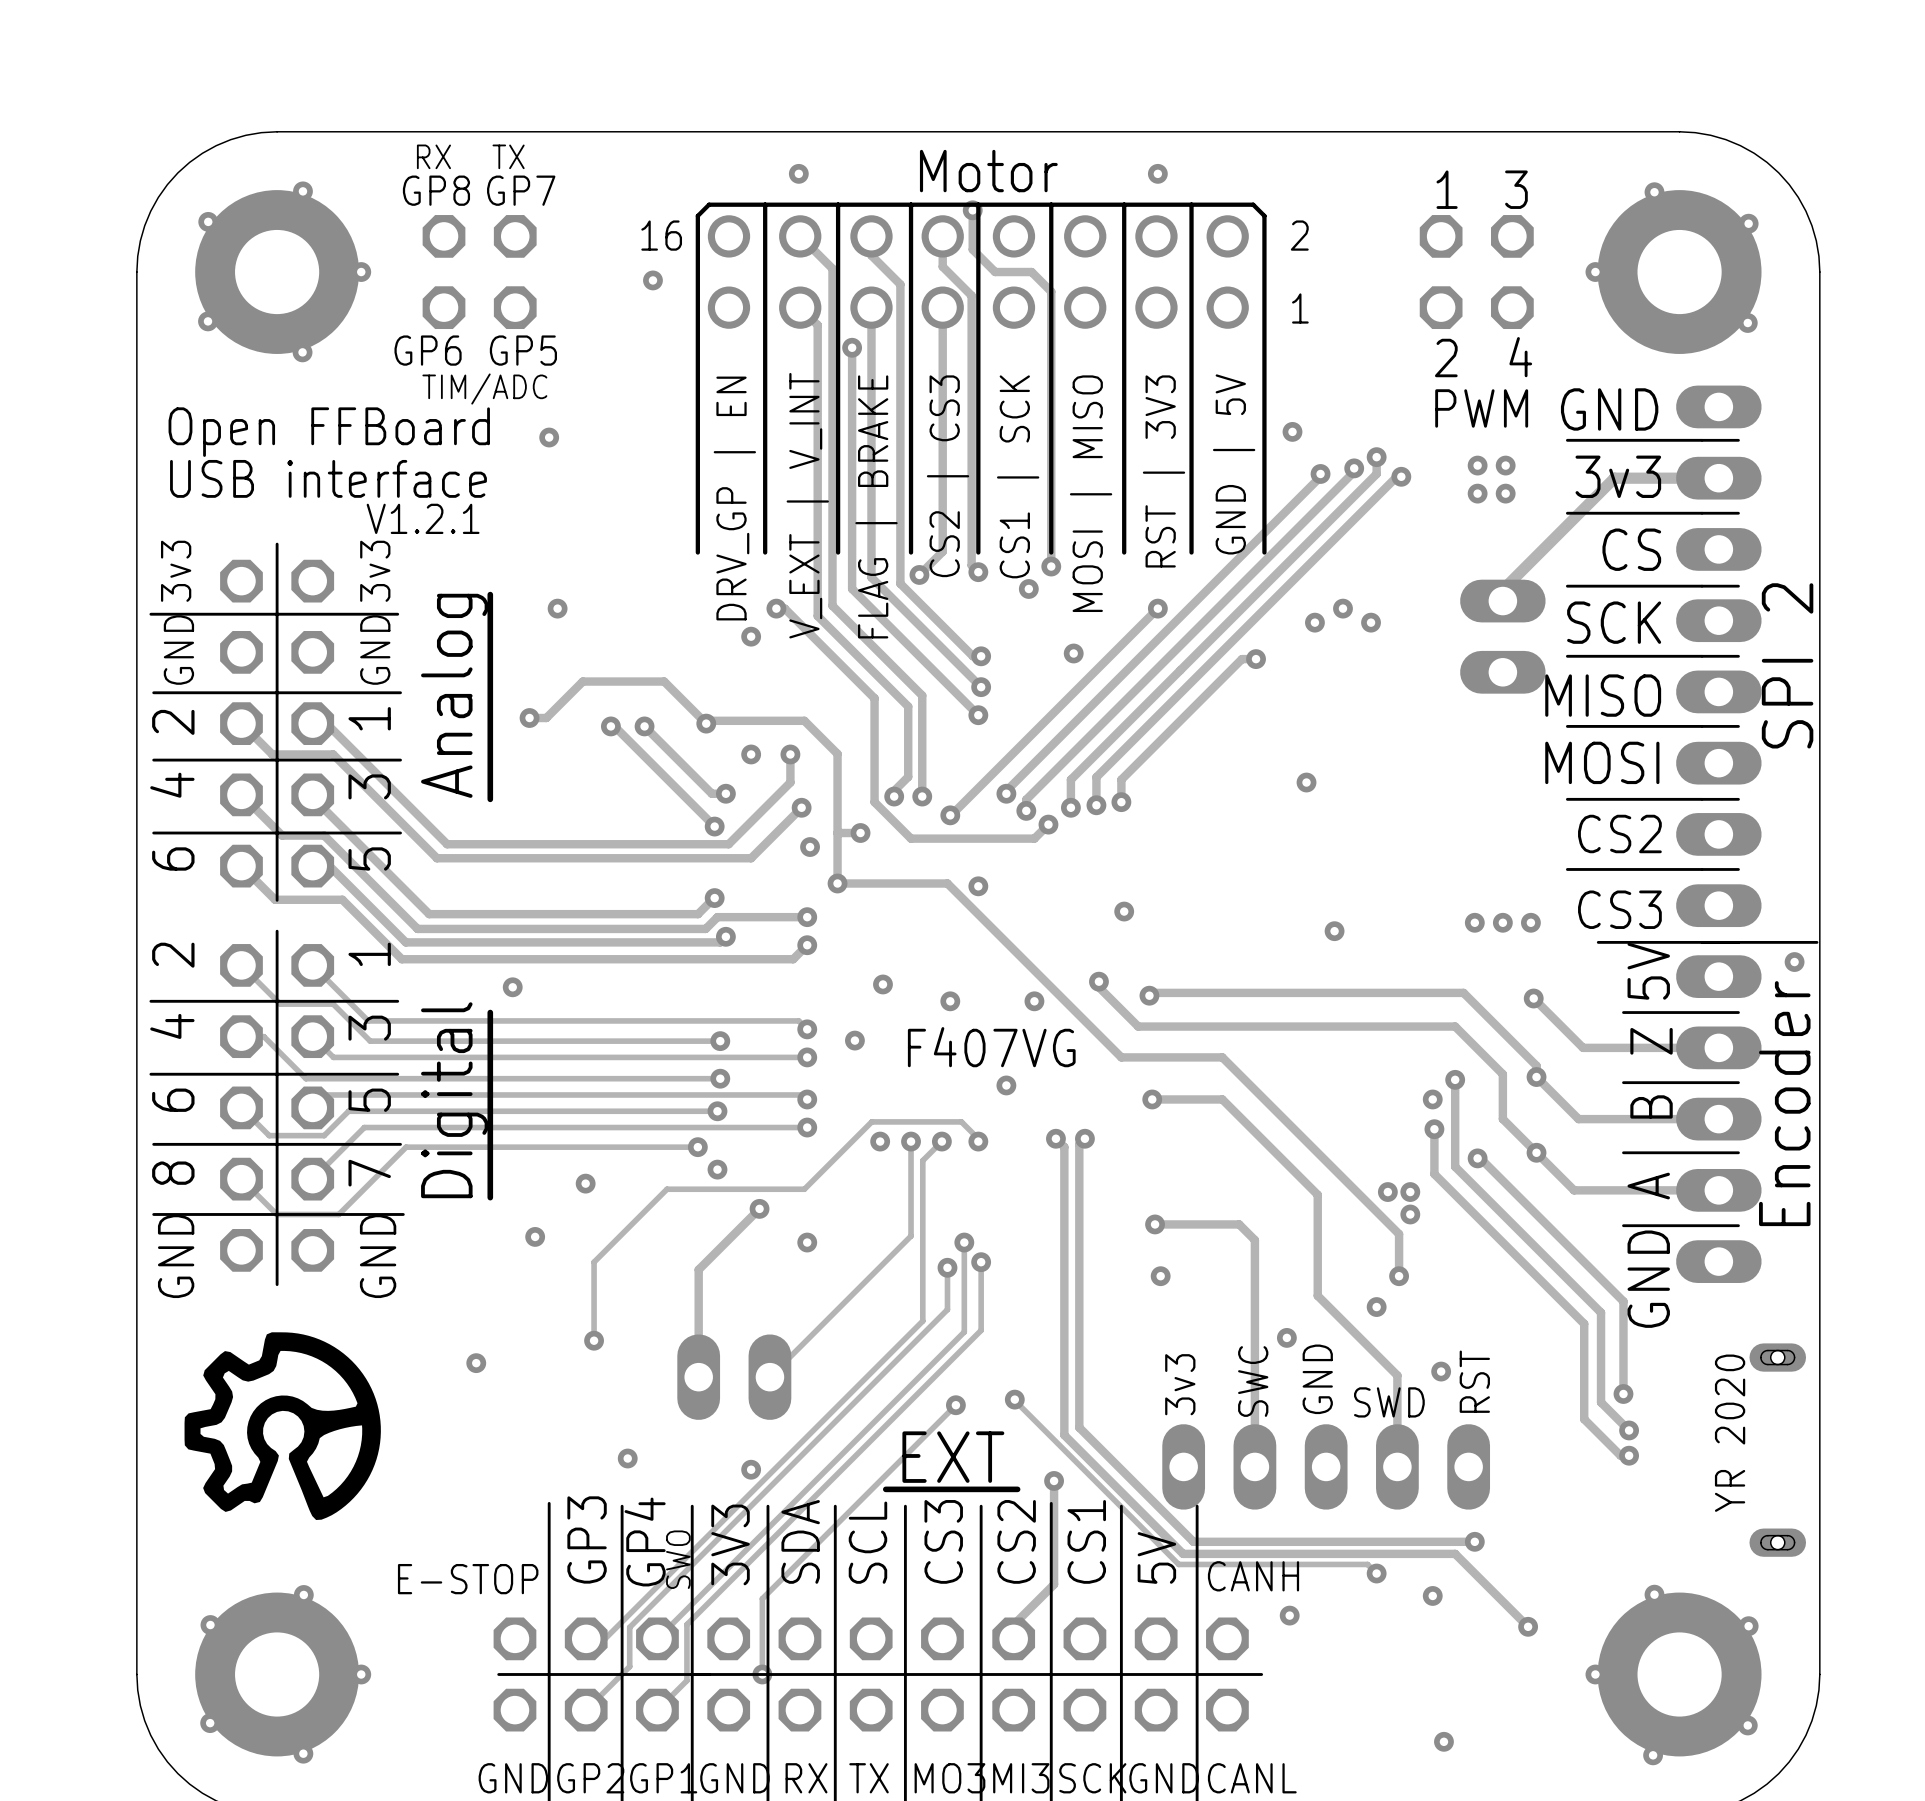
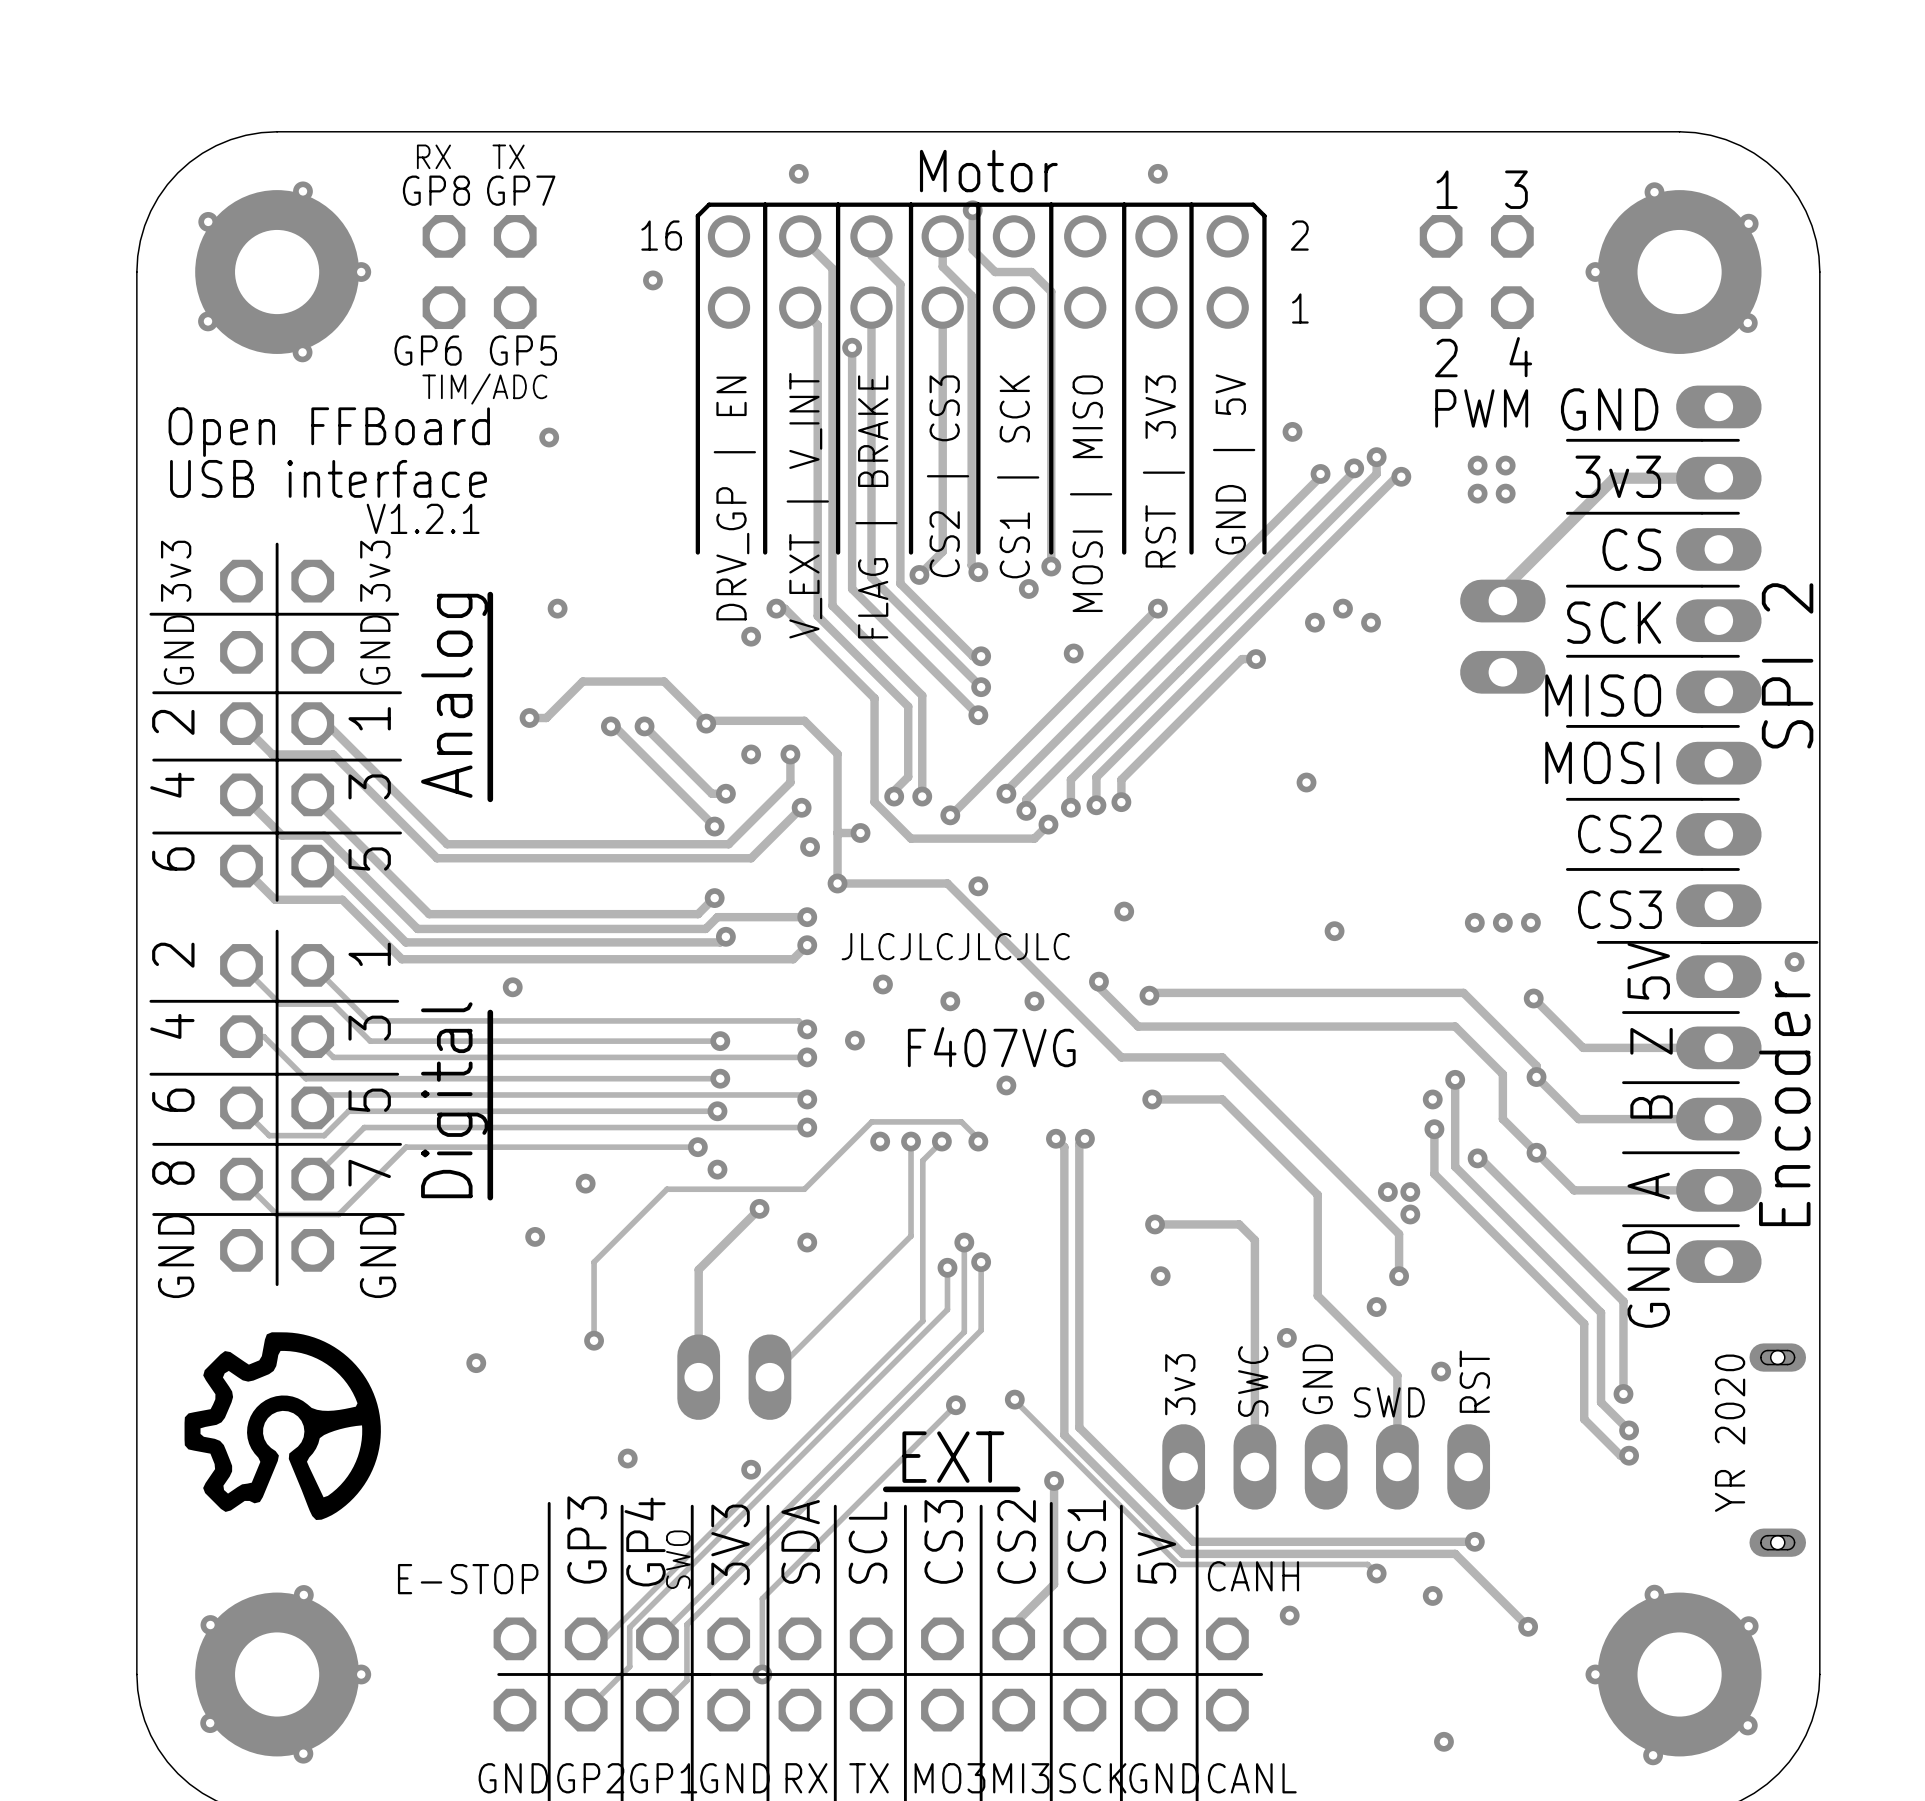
text: none -> JLCJLCJLCJLC (955, 946)

